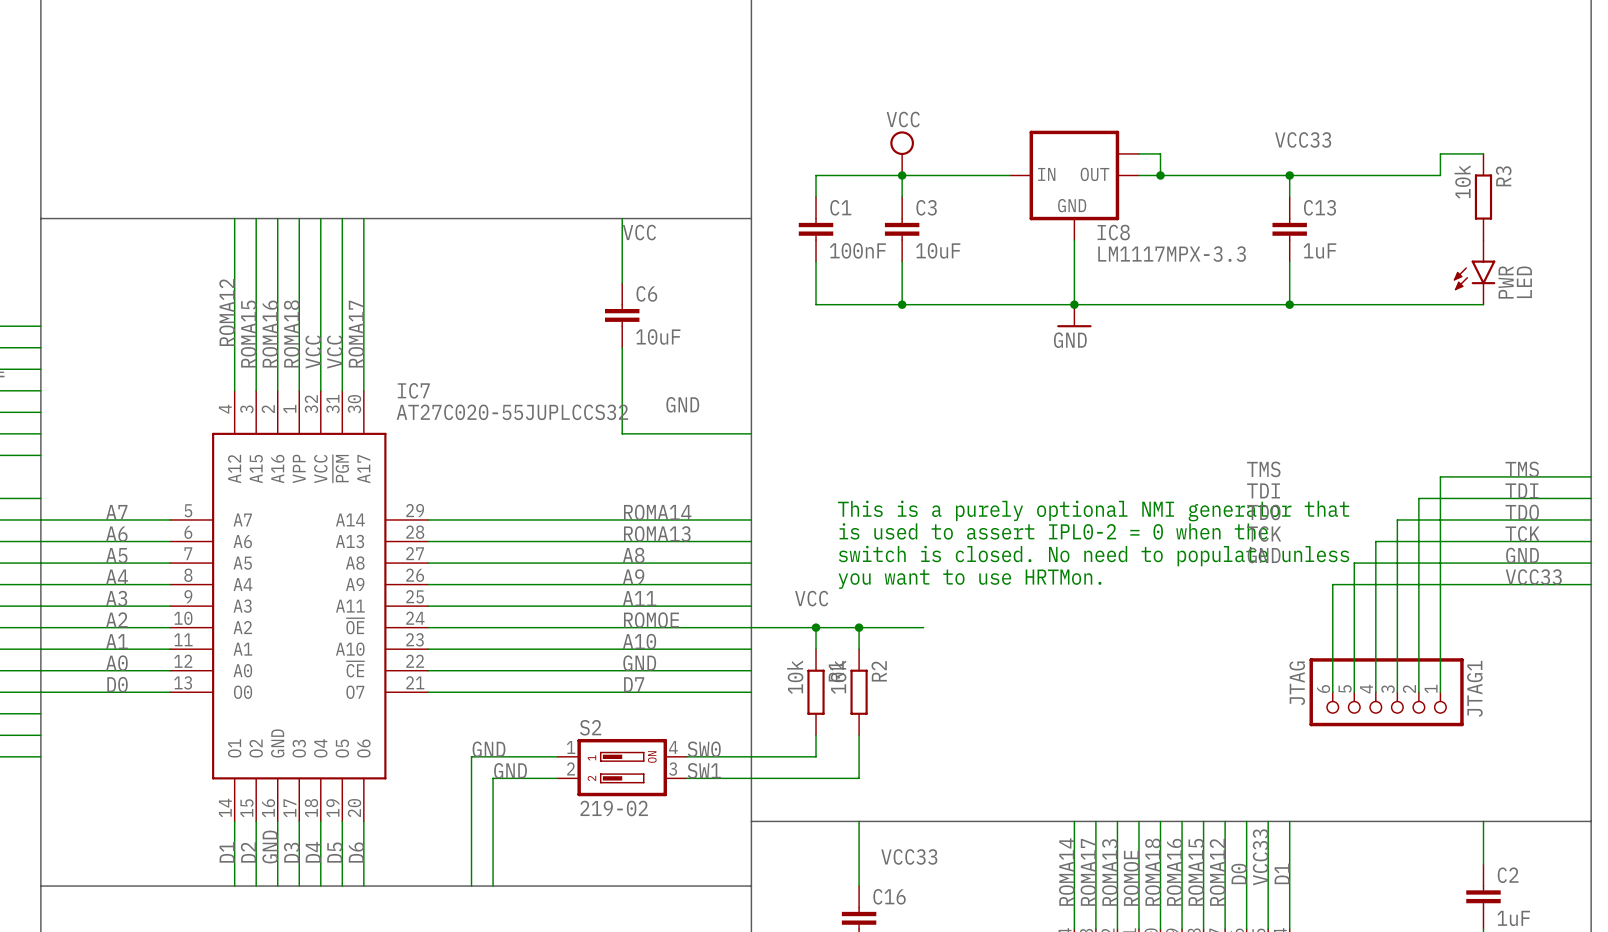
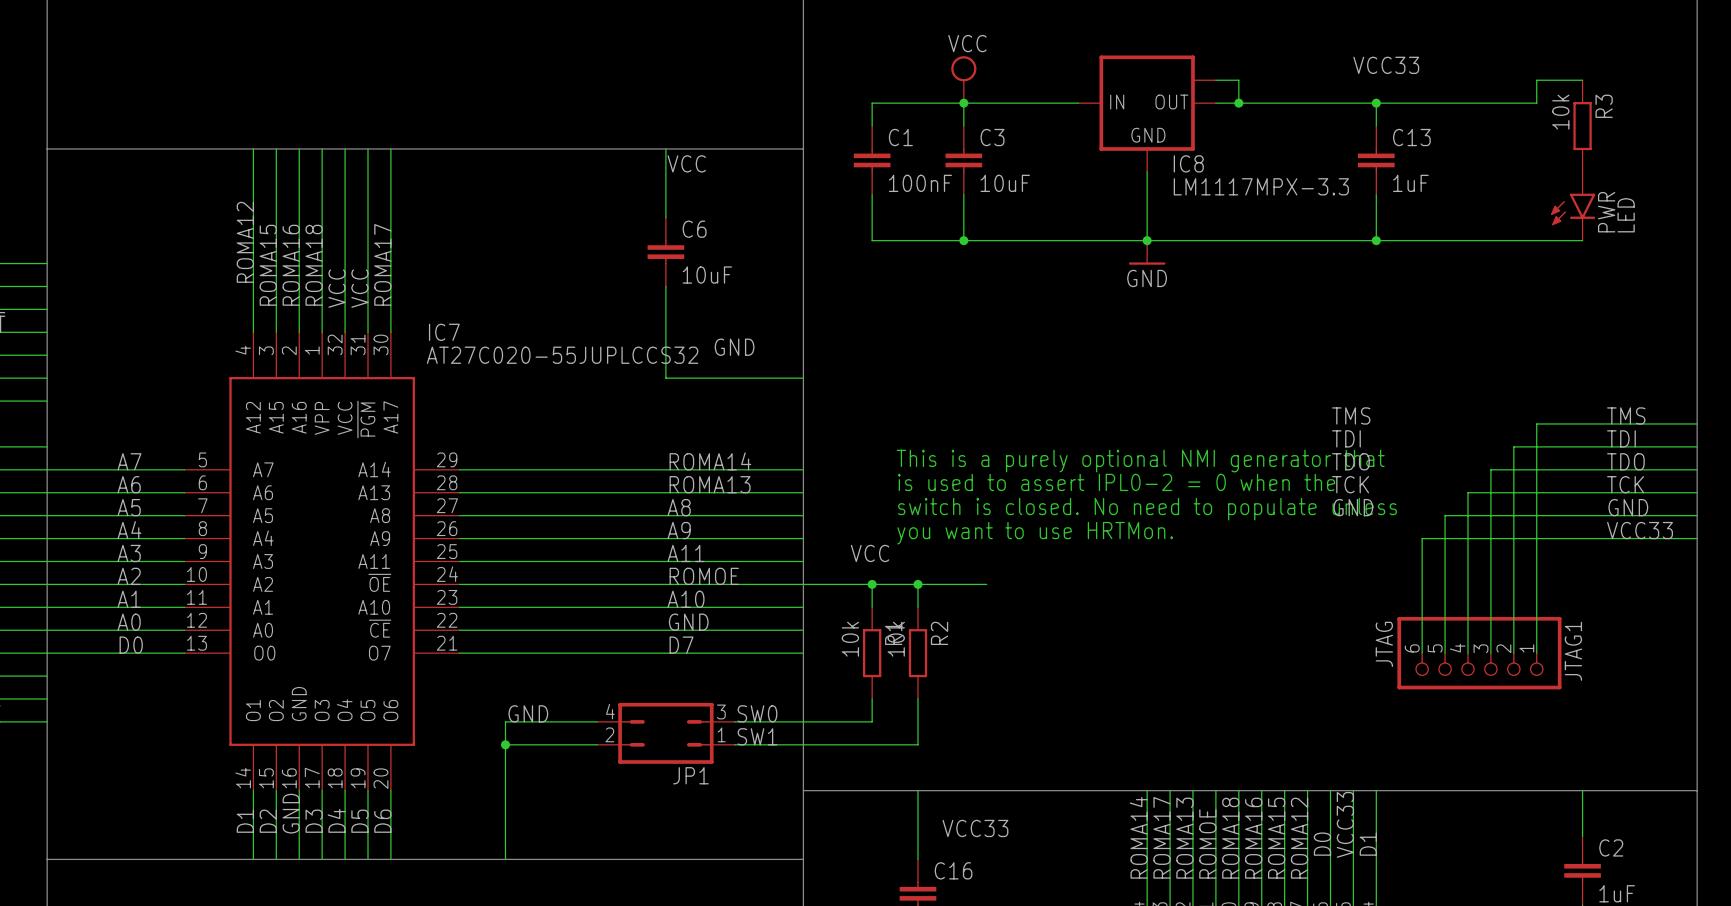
S2: 219-02 (622, 767) -> none
JP1: none -> (665, 733)
label: GND (510, 770) -> none
junction: none -> (505, 744)
wire: (493, 778) (493, 886) -> (528, 744) (505, 744)

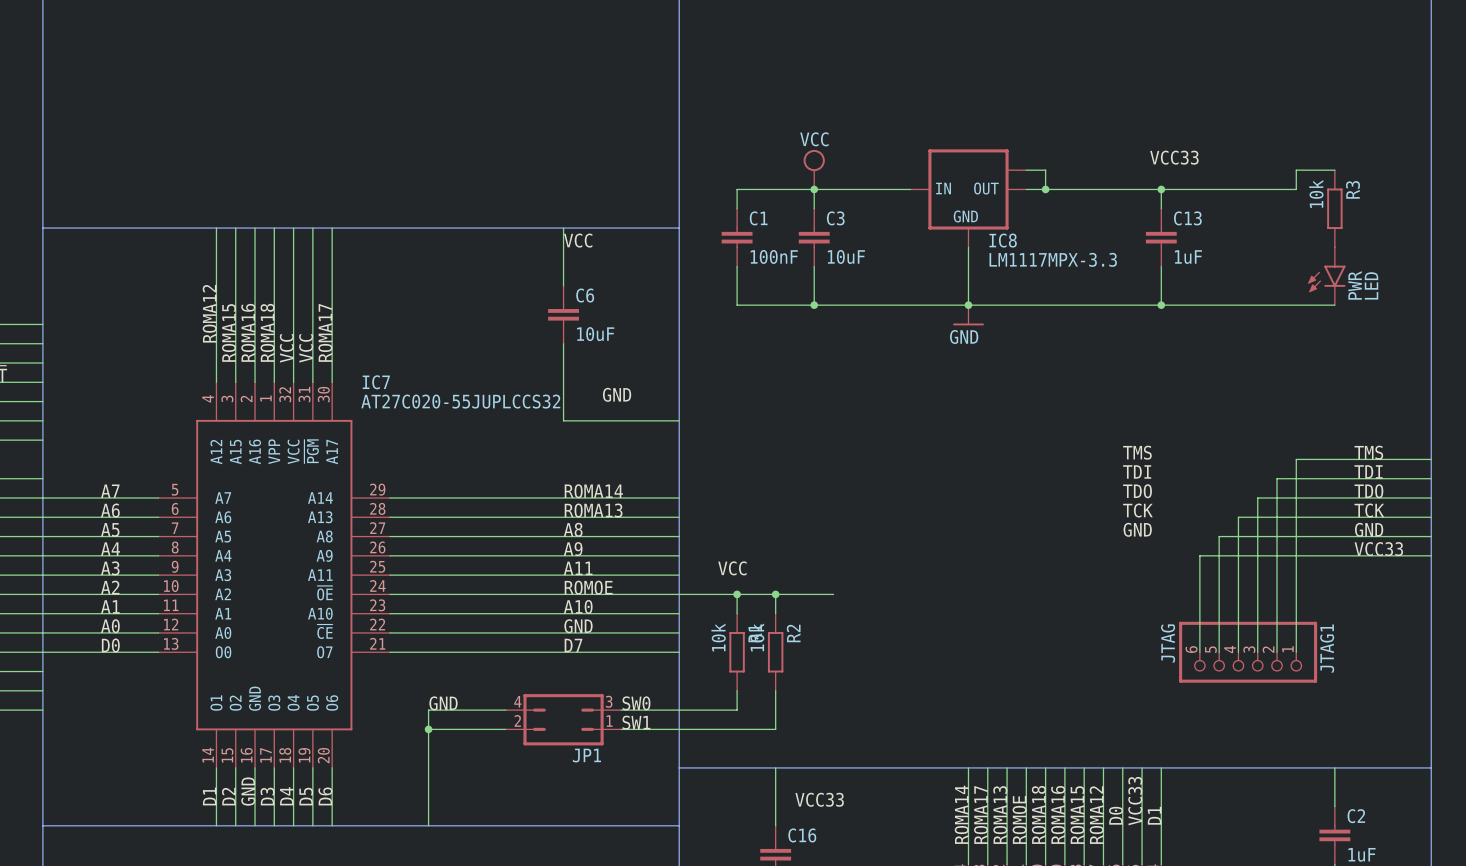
text: This is a purely optional NMI generator that (1140, 461) -> none
text: is used to assert IPL0-2 = 0 when the (1116, 482) -> none
text: switch is closed. No need to populate unless (1147, 509) -> none
text: you want to use HRTMon. (1035, 533) -> none

